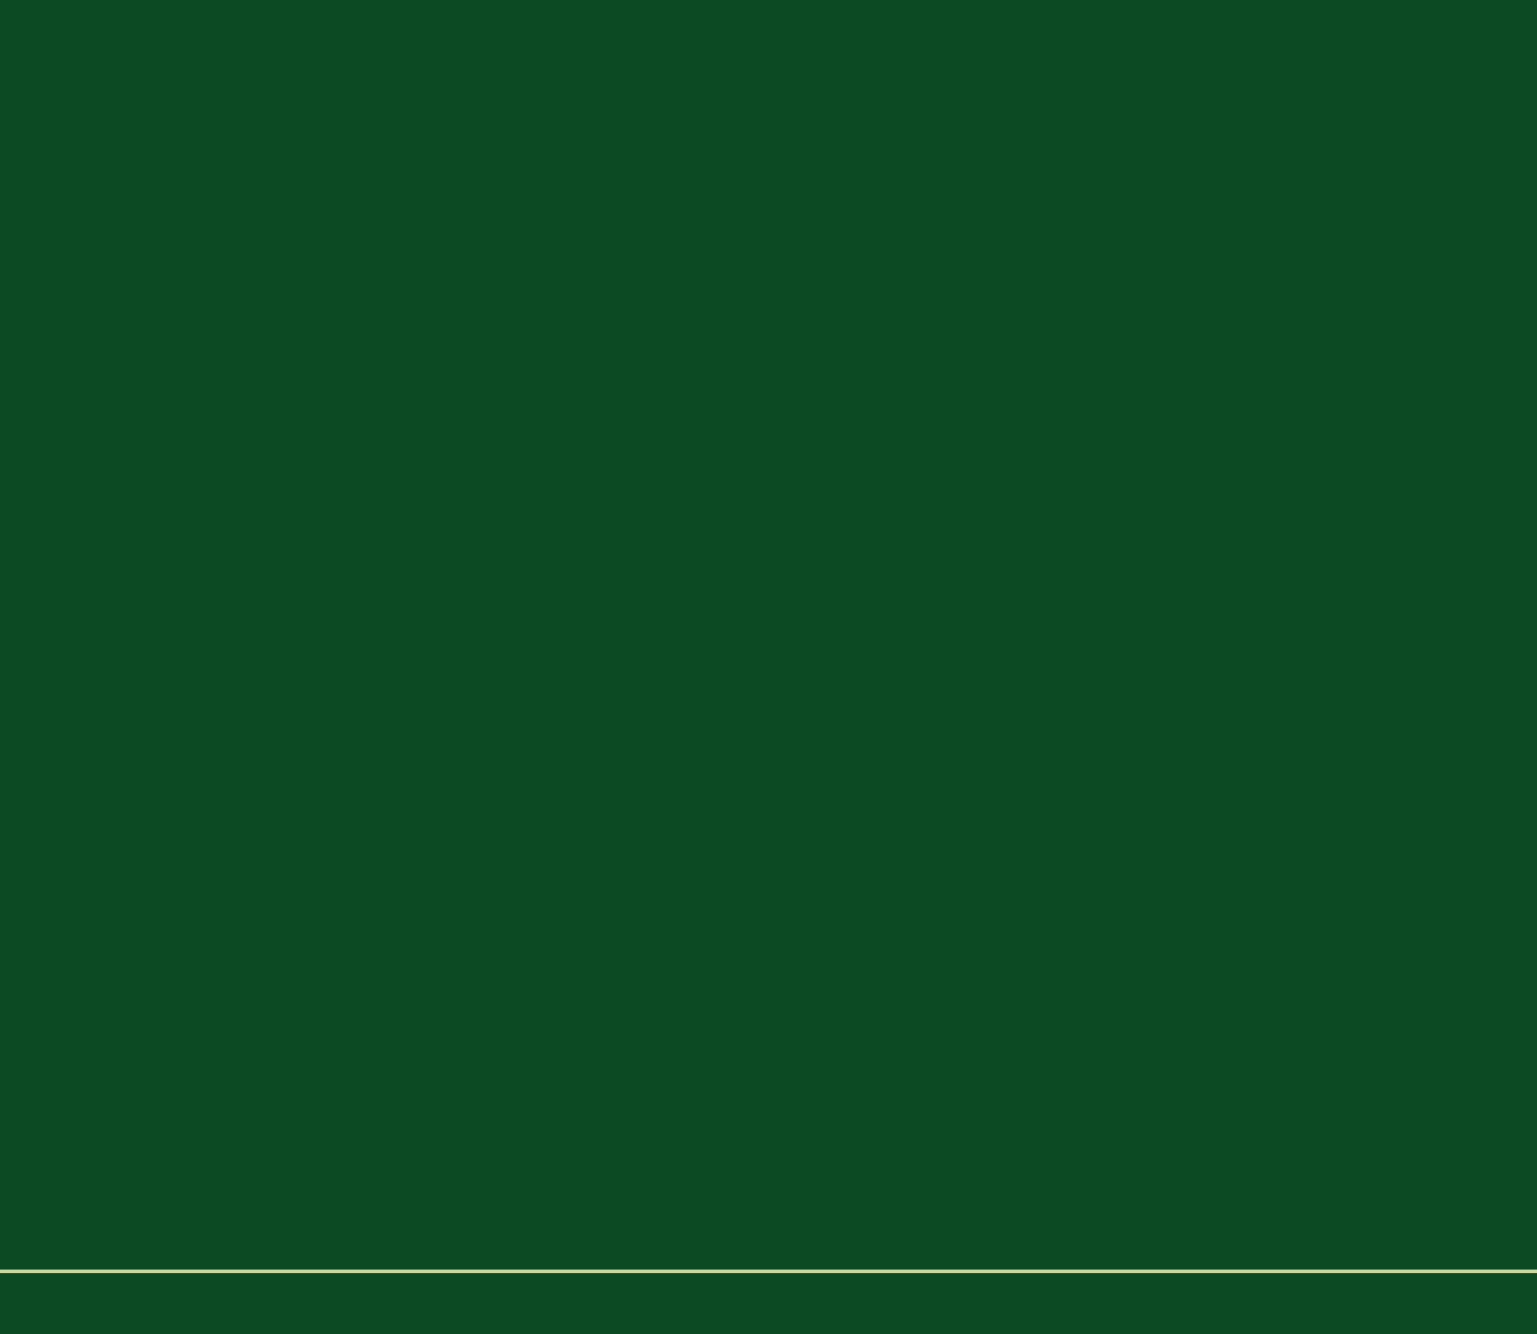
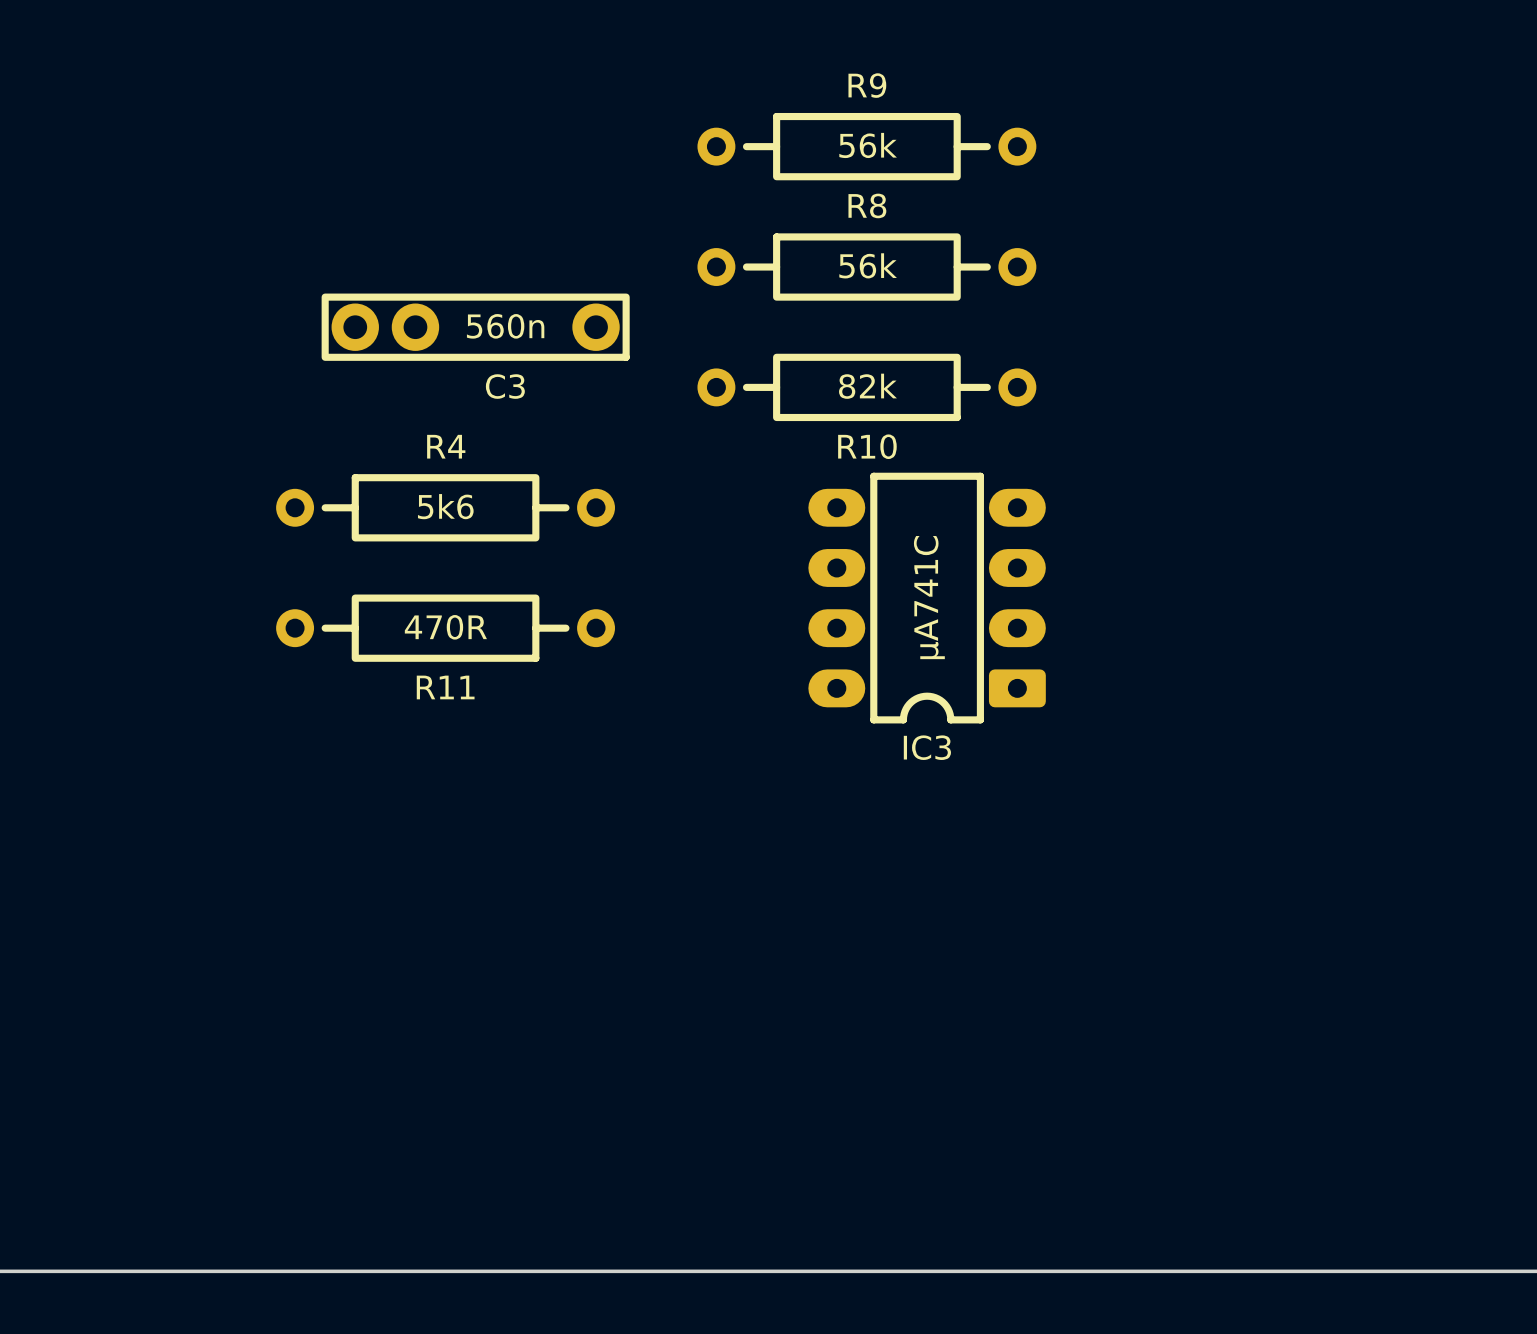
R9: none -> 56k (866, 146)
R8: none -> 56k (866, 267)
C3: none -> 560n (475, 327)
R10: none -> 82k (866, 387)
R4: none -> 5k6 (445, 507)
IC3: none -> µA741C (927, 598)
R11: none -> 470R (445, 628)

